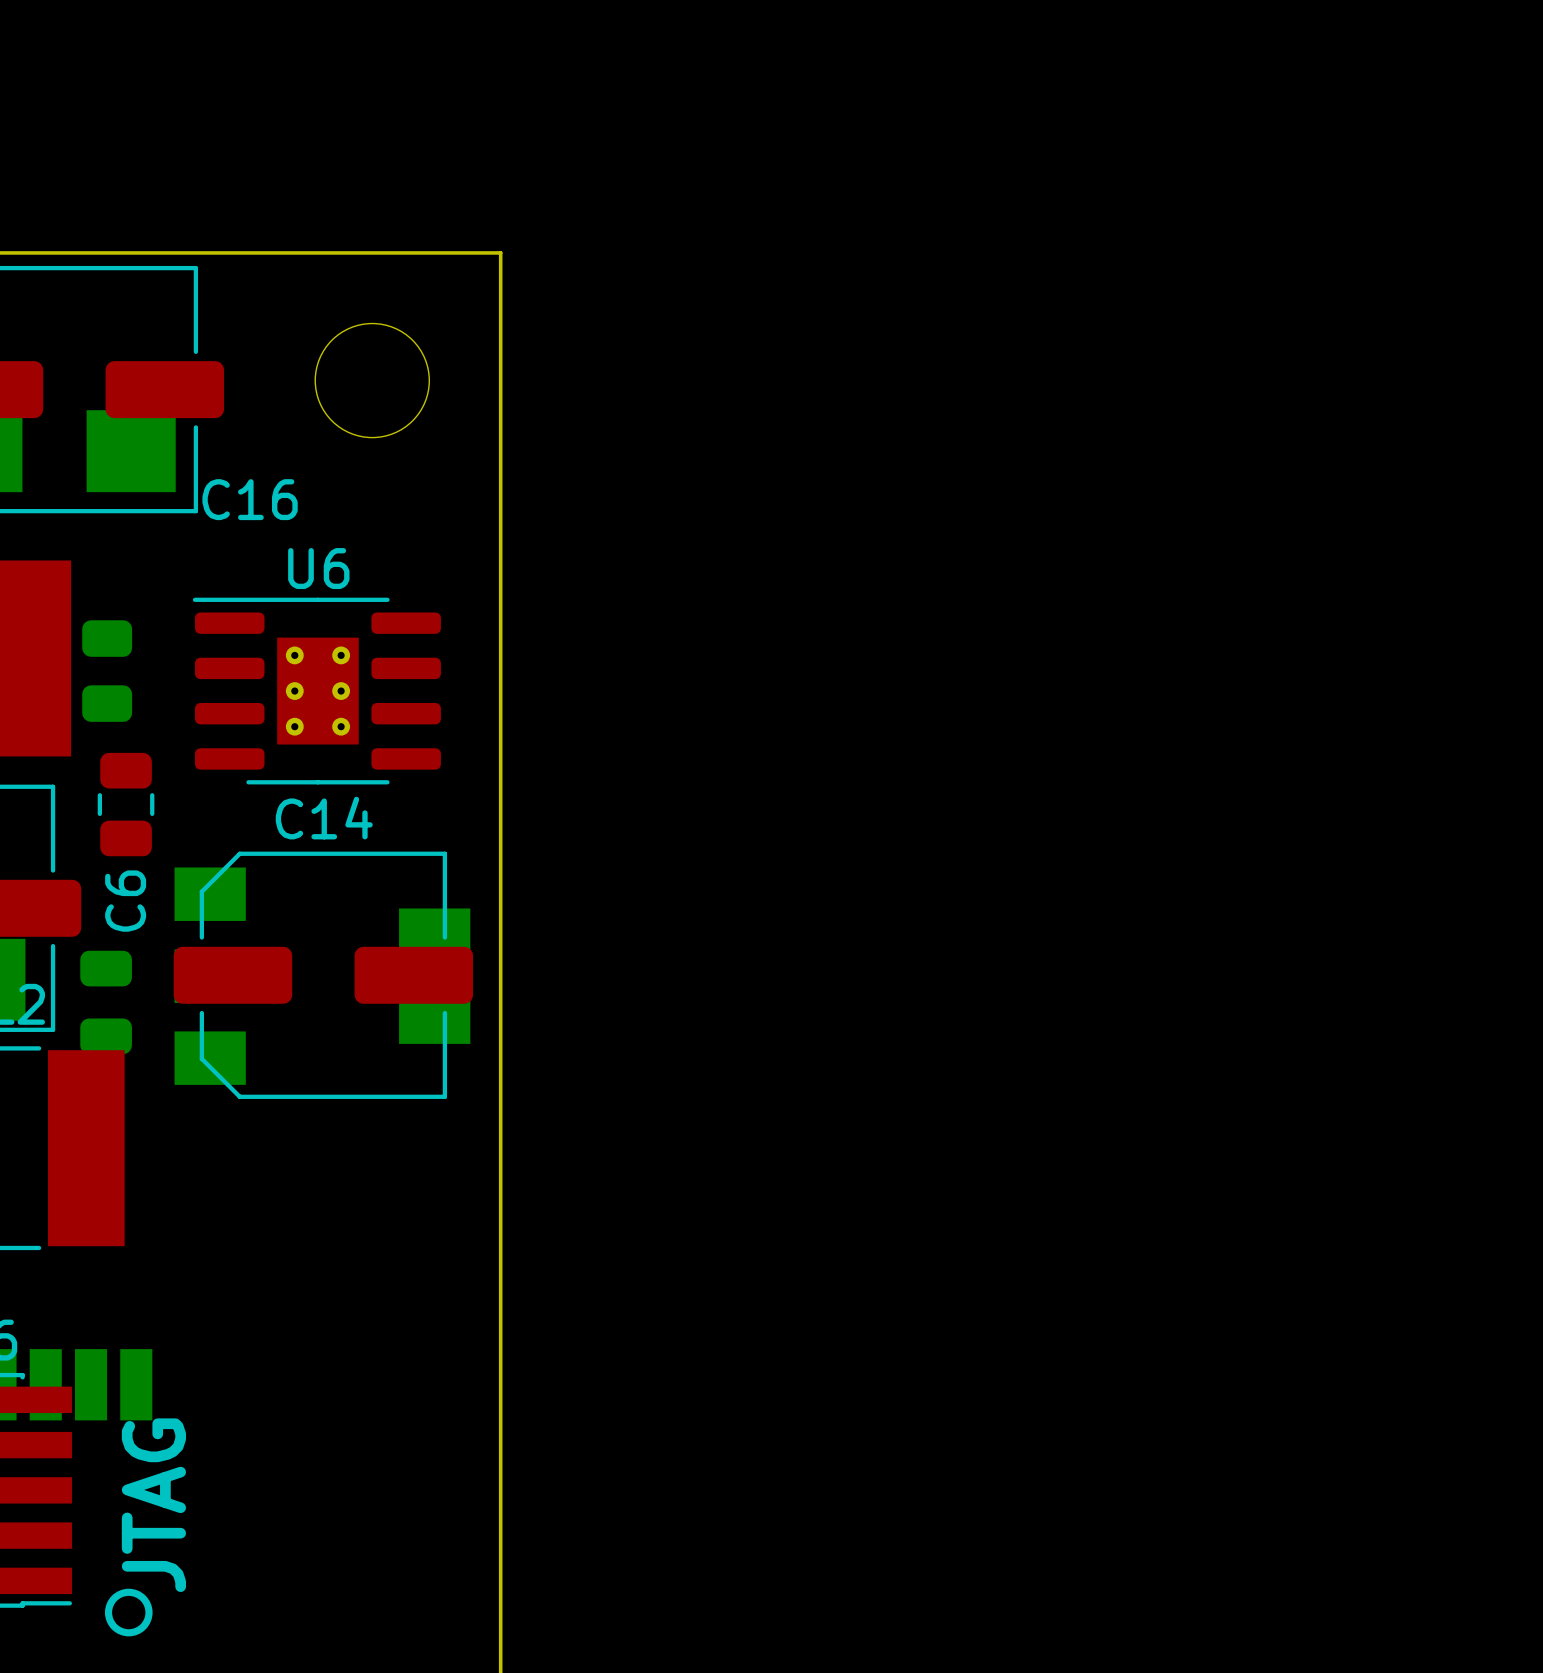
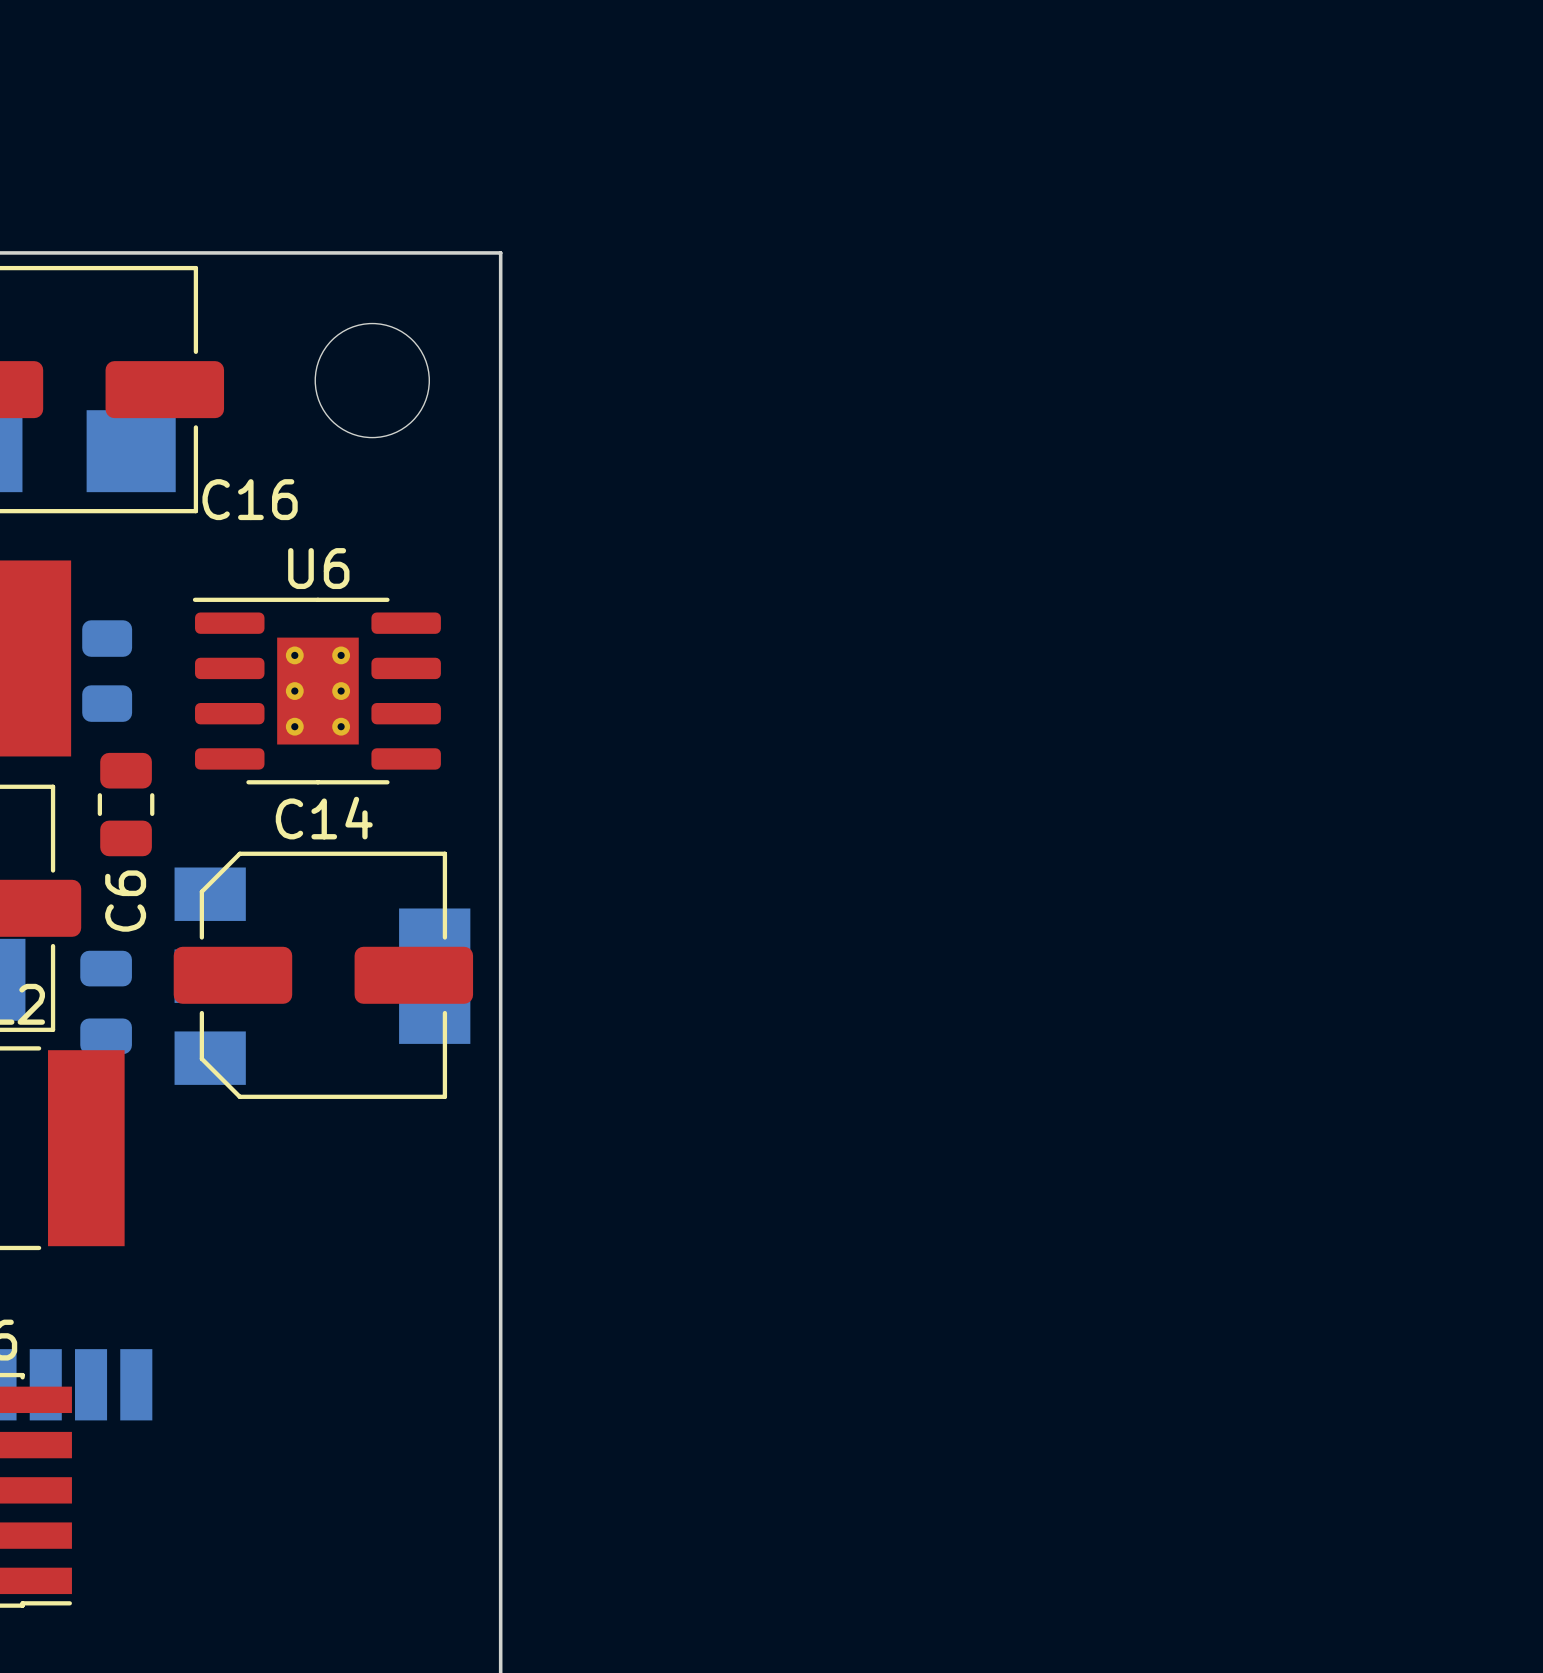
text: JTAG (153, 1505) -> none
drawing: [104, 1588, 153, 1637] -> none

